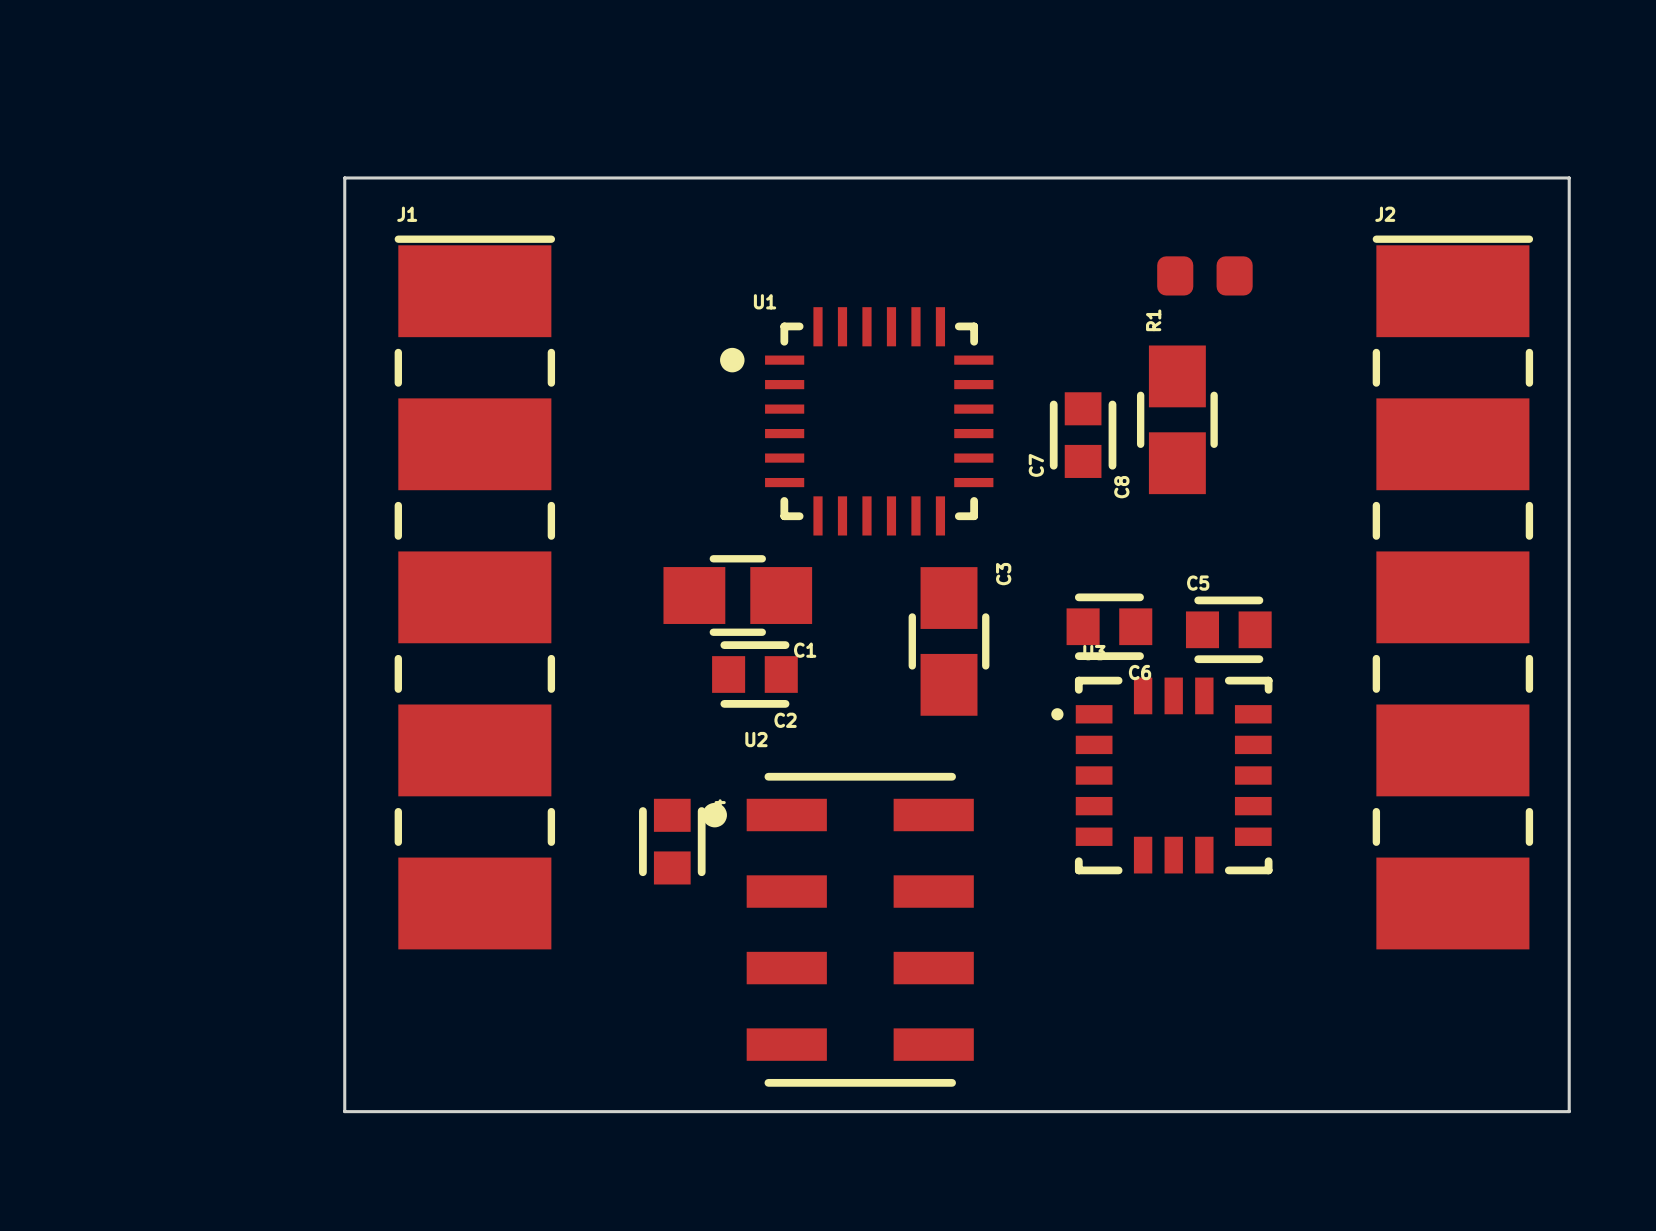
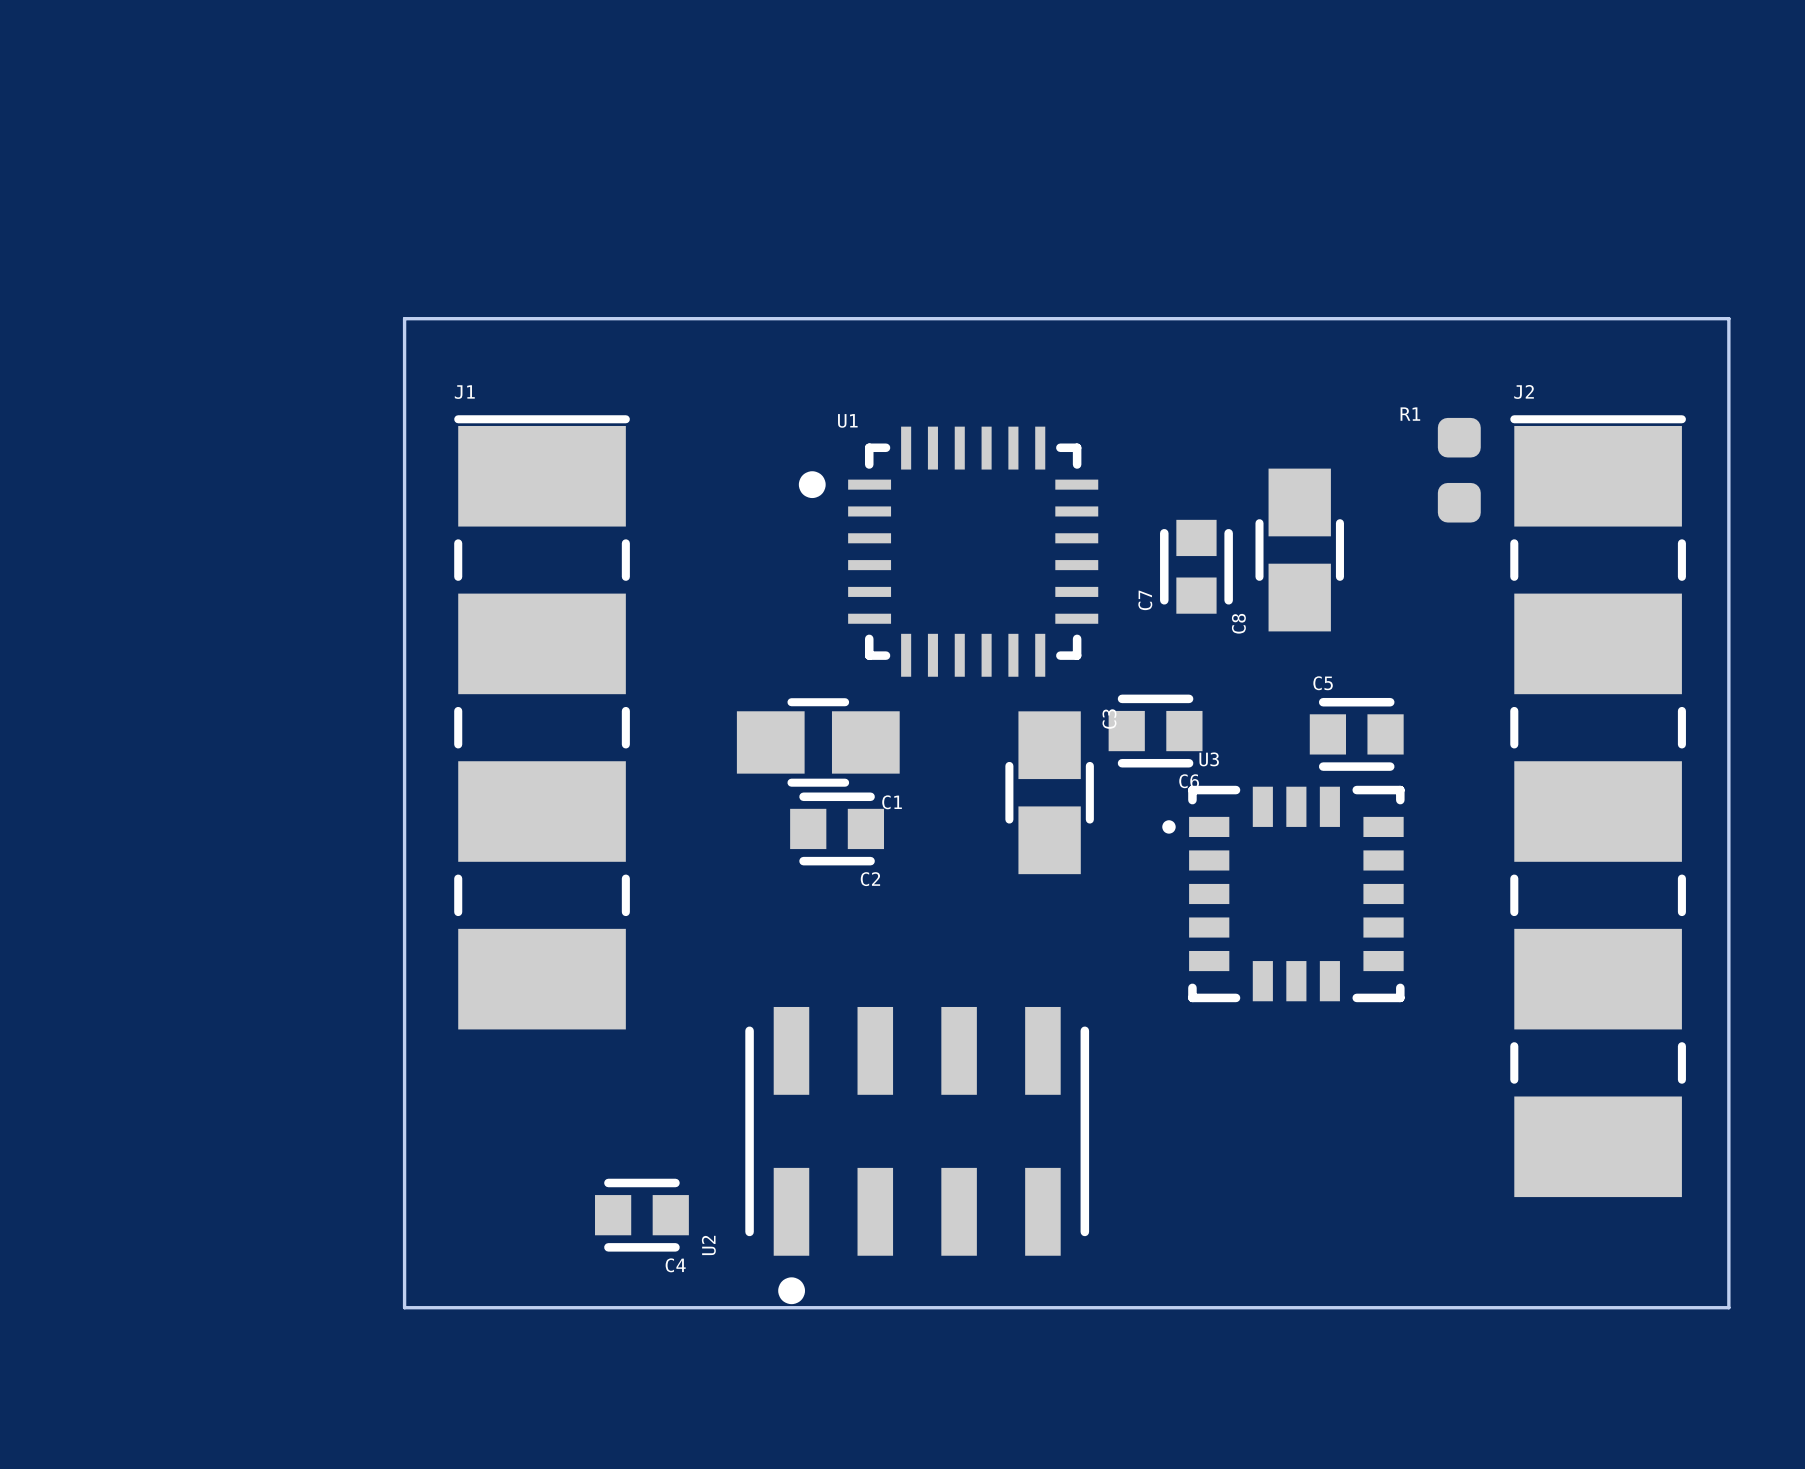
board edge: (1569, 208) (1569, 177) (344, 177) (344, 1111) (360, 1111) -> (1728, 318) (404, 318) (404, 1307)
J1 footprint: [394, 235, 556, 950] -> [454, 415, 630, 1030]
R1 rotation: 0° (1204, 275) -> 90° clockwise (1459, 470)
R1 position: (1204, 275) -> (1459, 470)
J2 position: (1452, 592) -> (1598, 806)
C6 position: (1109, 626) -> (1155, 731)
C5 position: (1228, 629) -> (1356, 734)
U3 position: (1161, 775) -> (1283, 893)
C4 rotation: 0° (672, 841) -> 90° clockwise (641, 1215)
C4 position: (672, 841) -> (641, 1215)
U2 rotation: 0° (838, 929) -> 90° counterclockwise (917, 1155)

